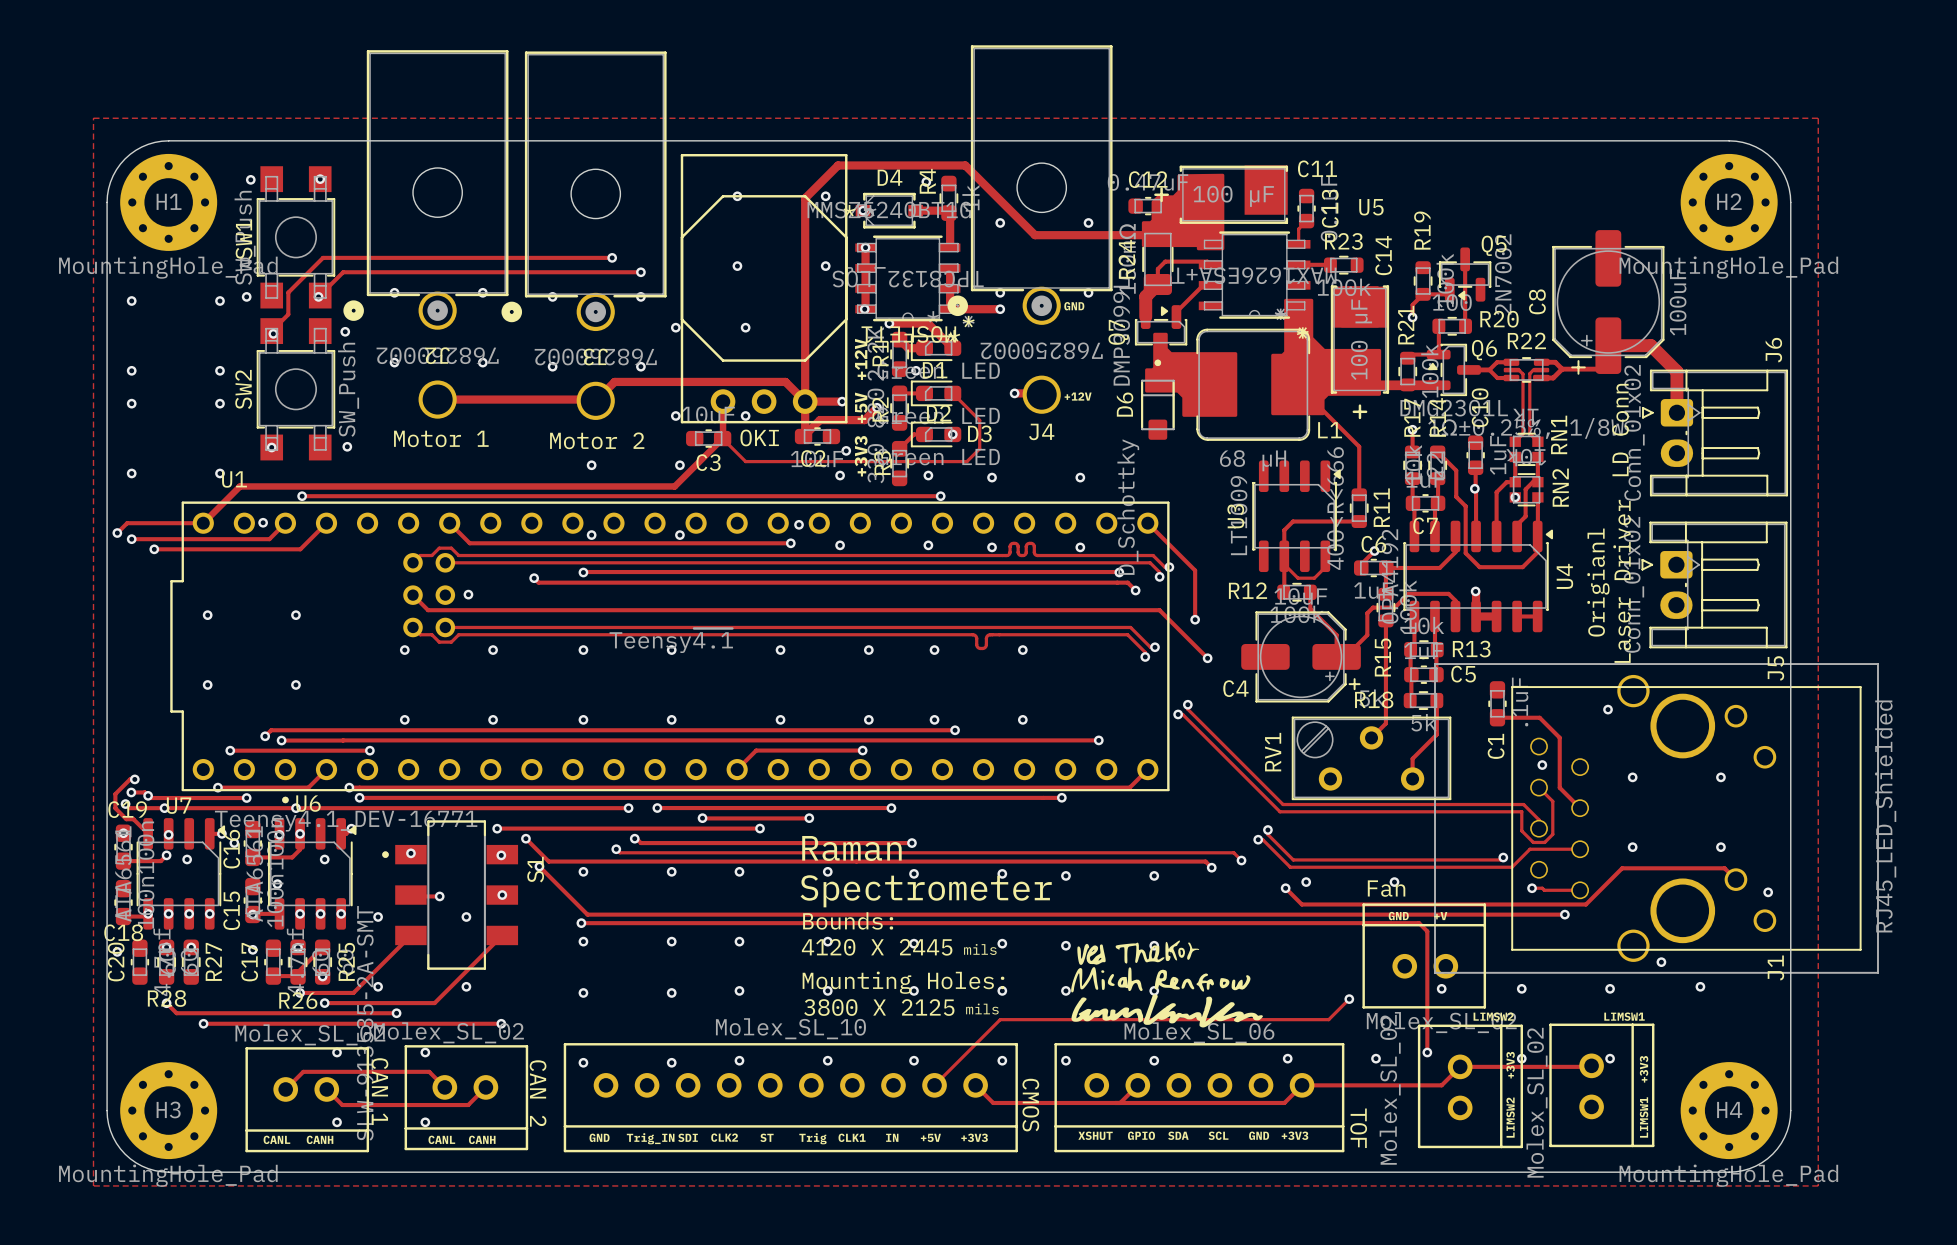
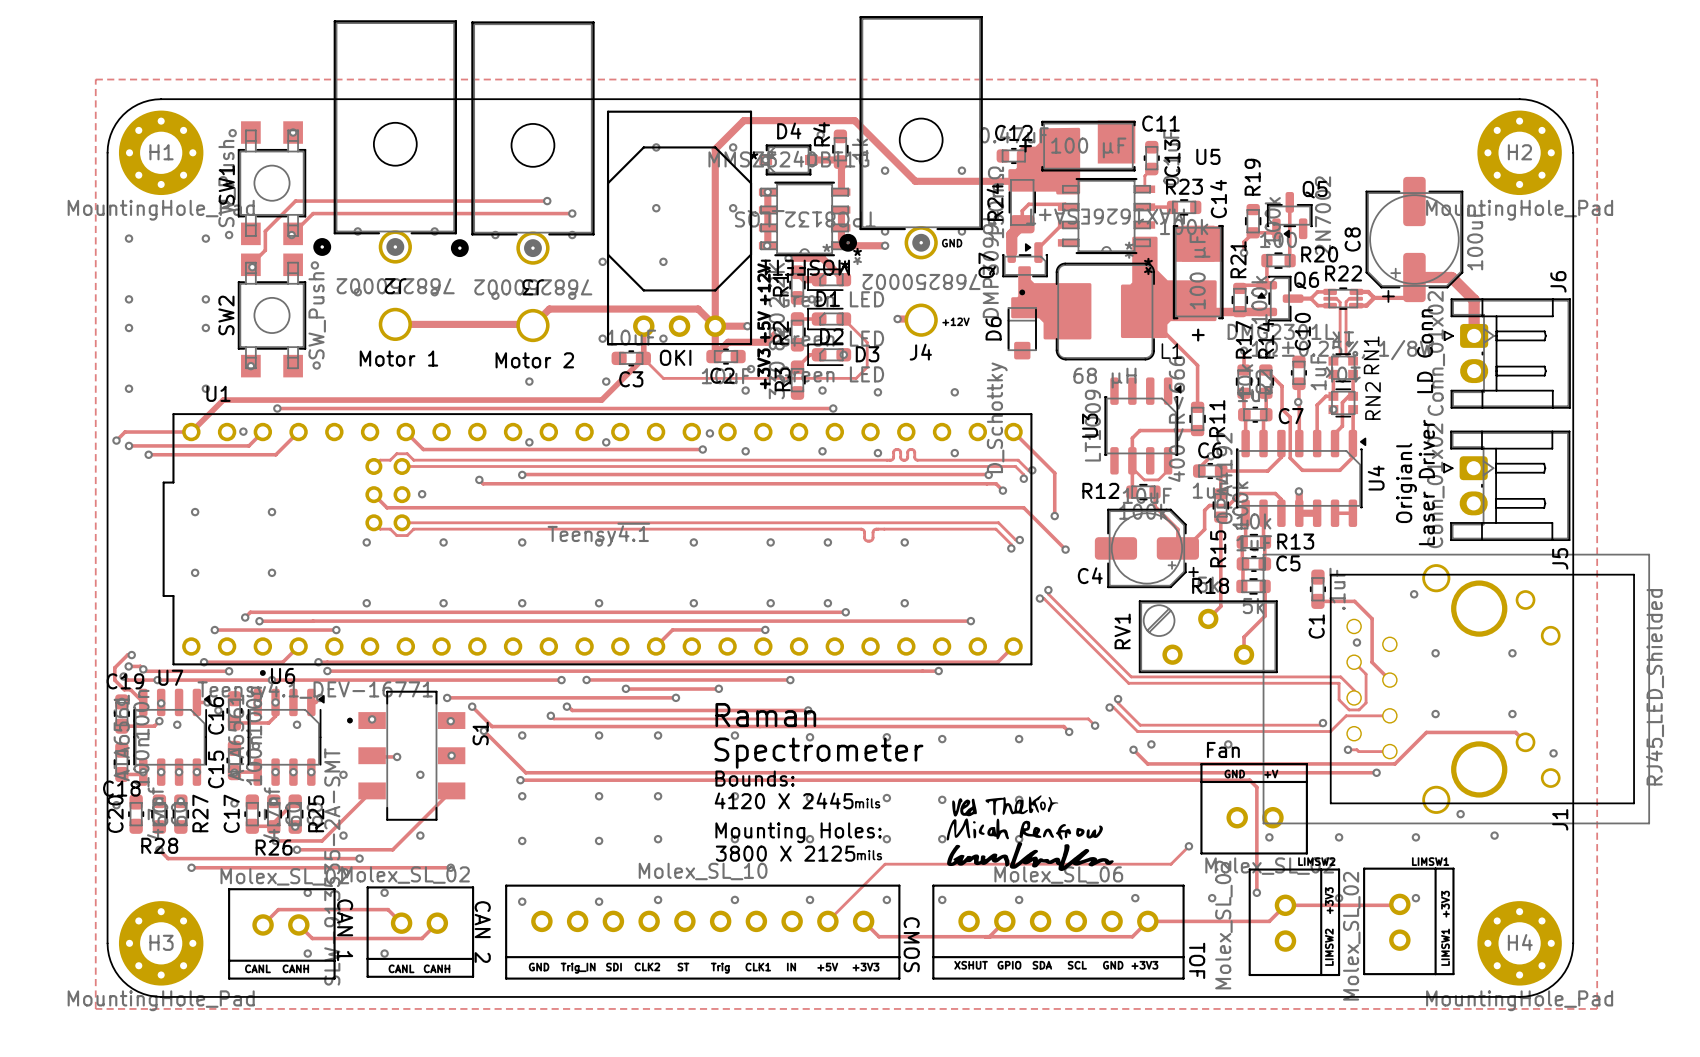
C7 name position: C7 (1425, 525) -> C7 (1291, 416)

